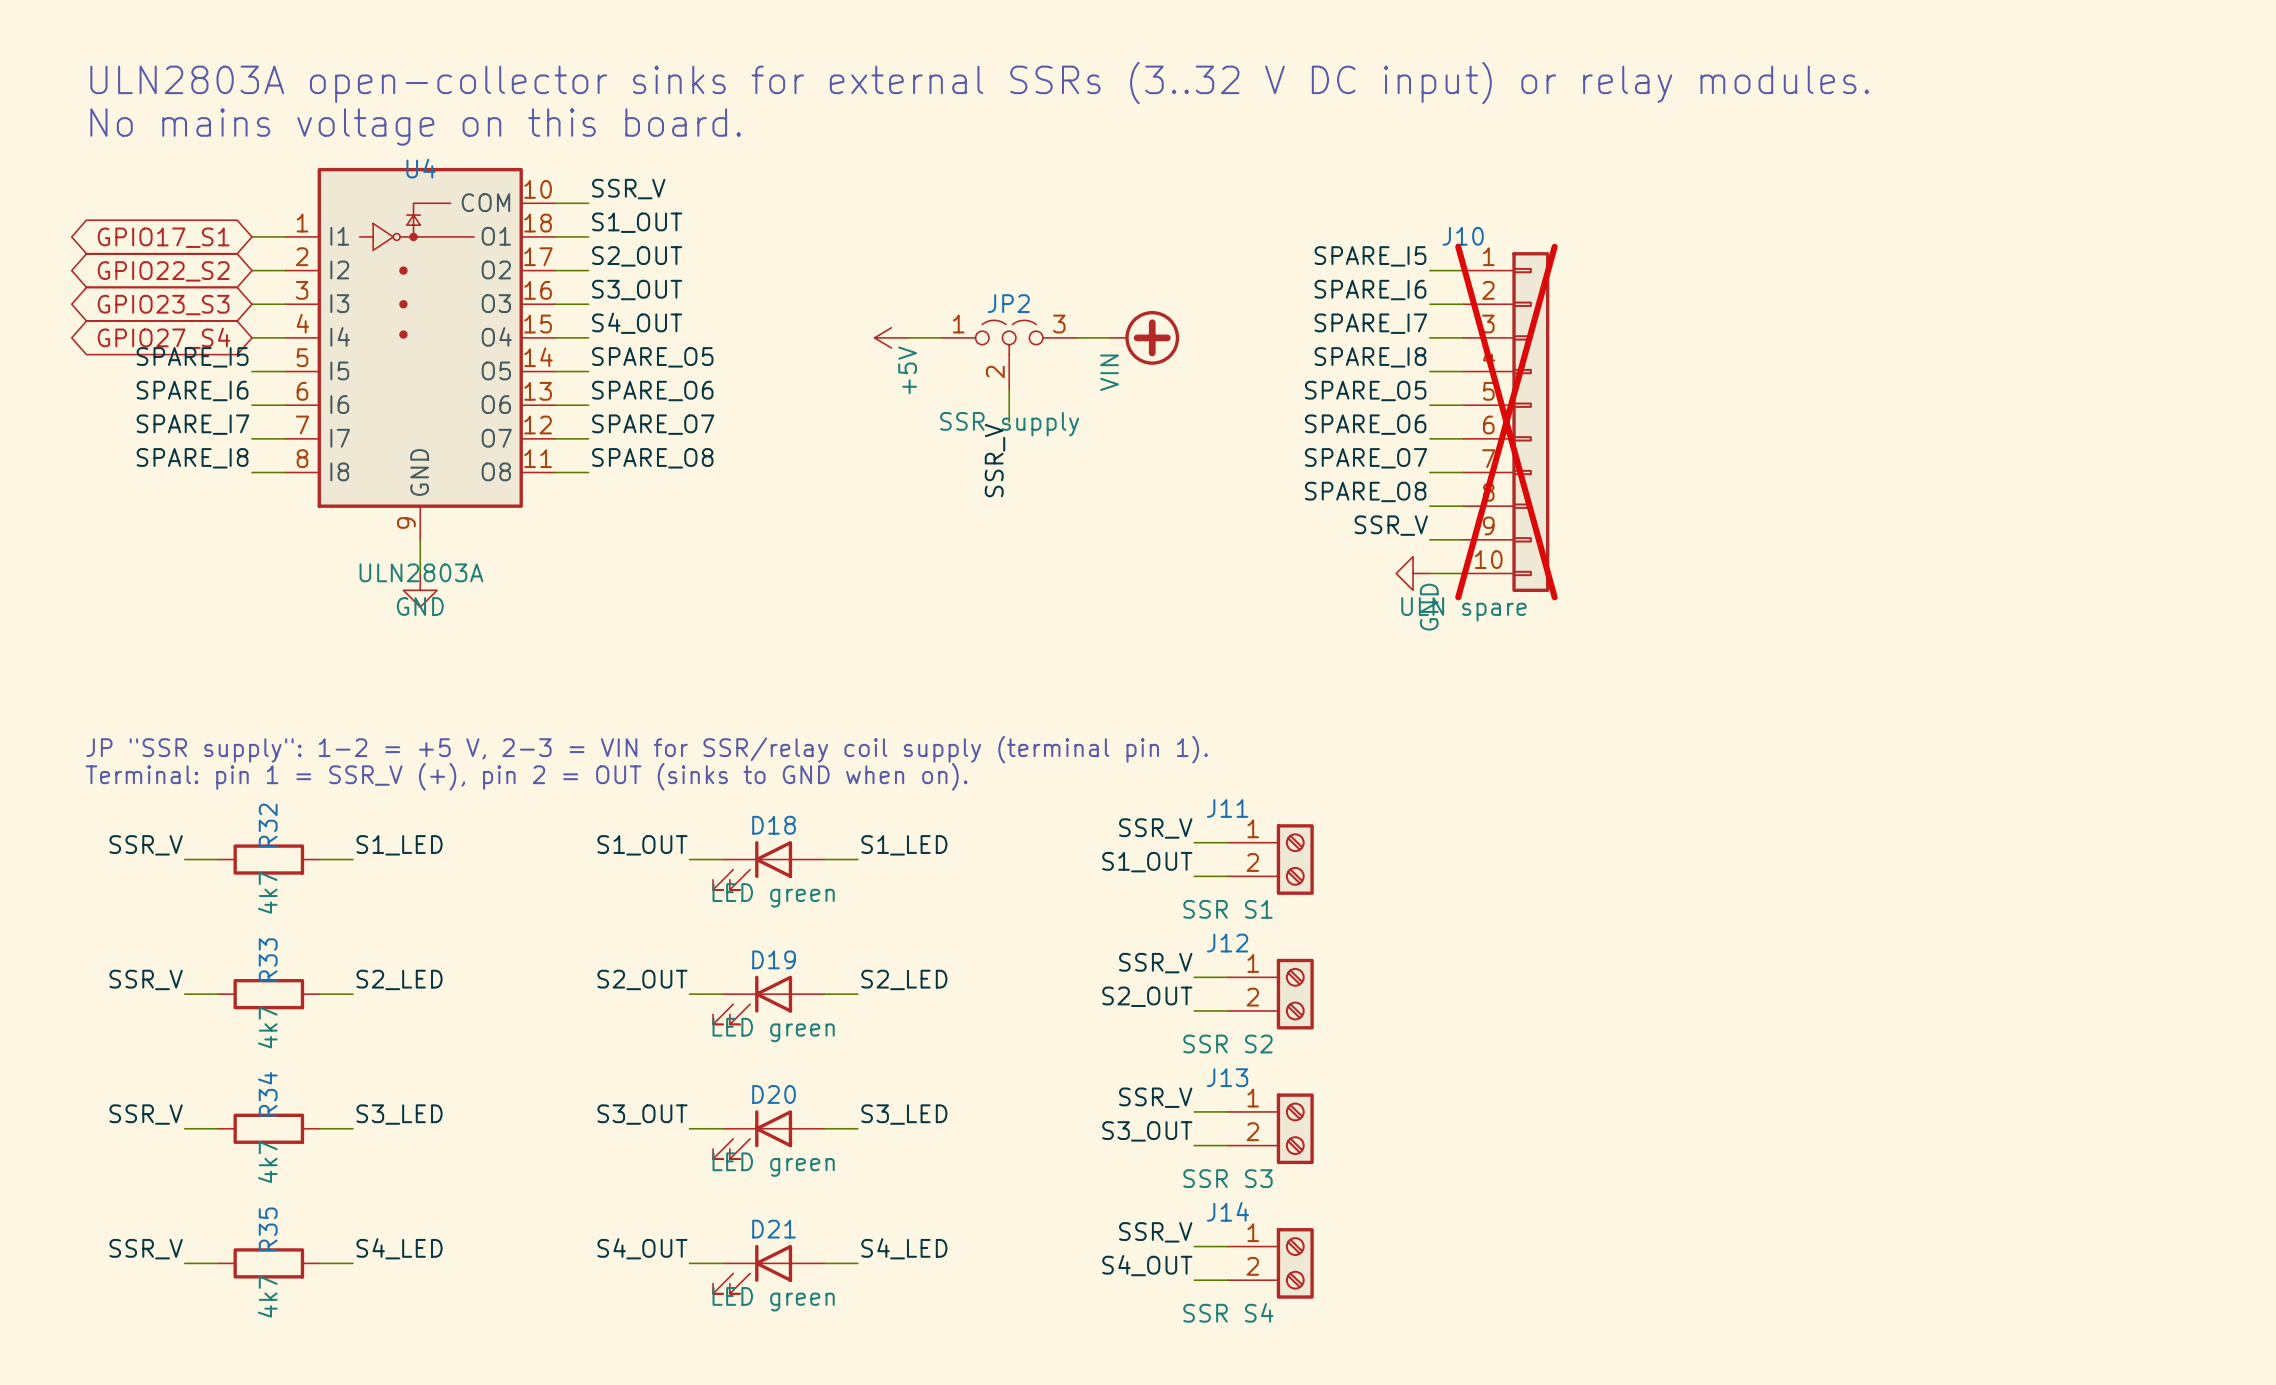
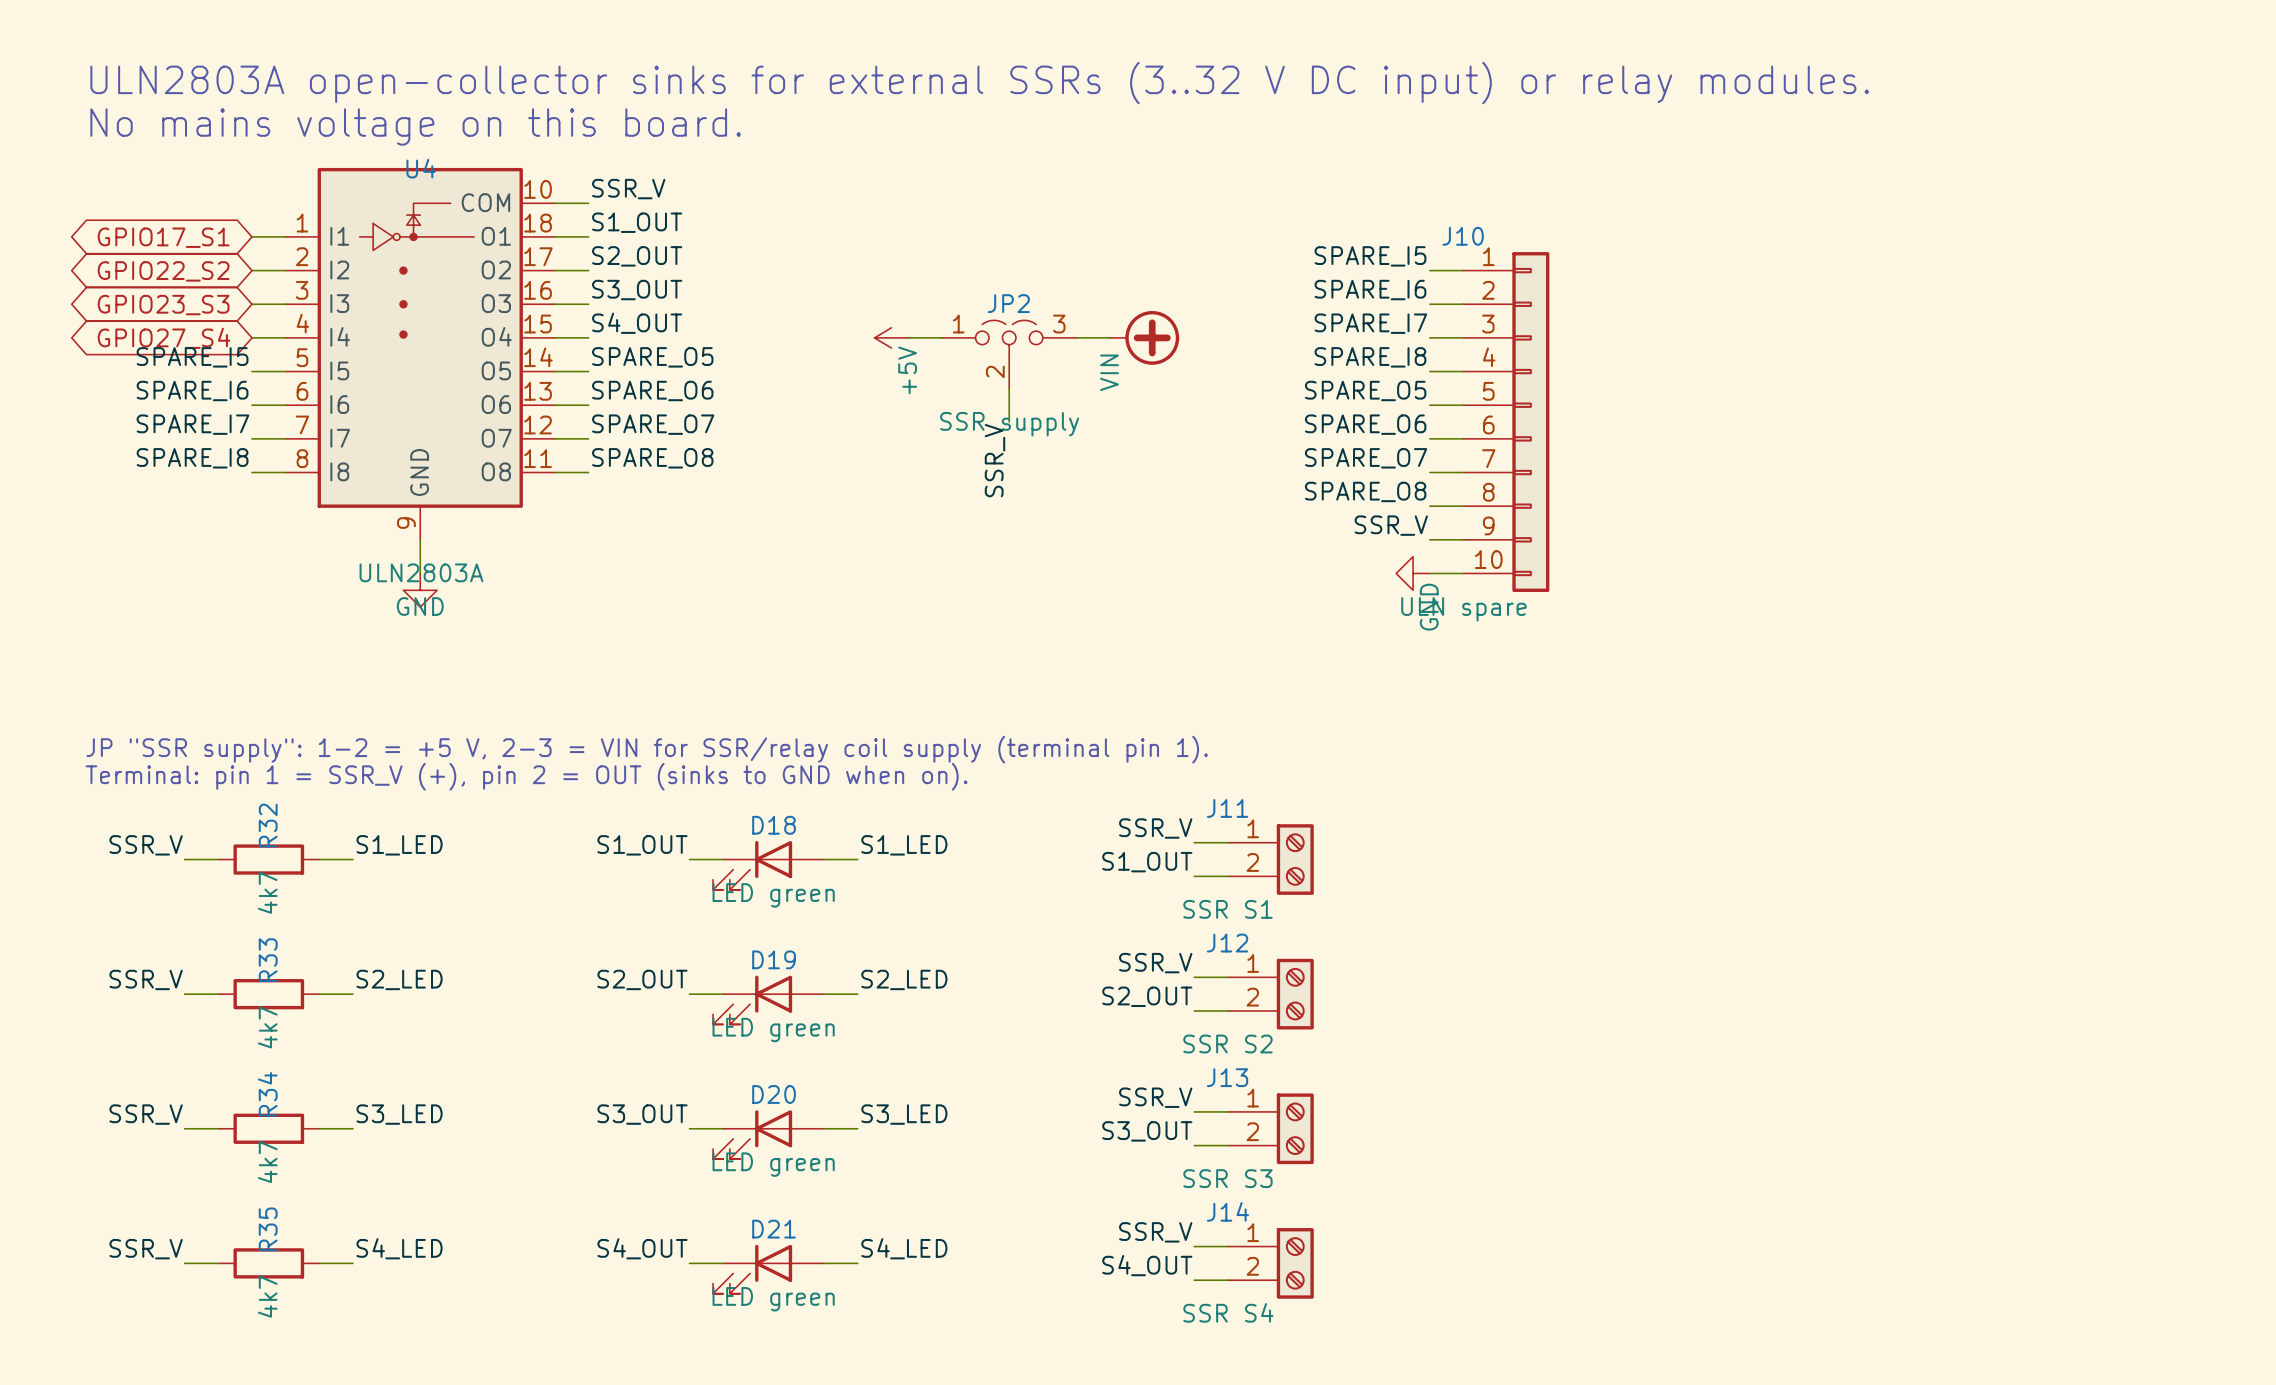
J10 do-not-place cross: (1506, 422) -> none

